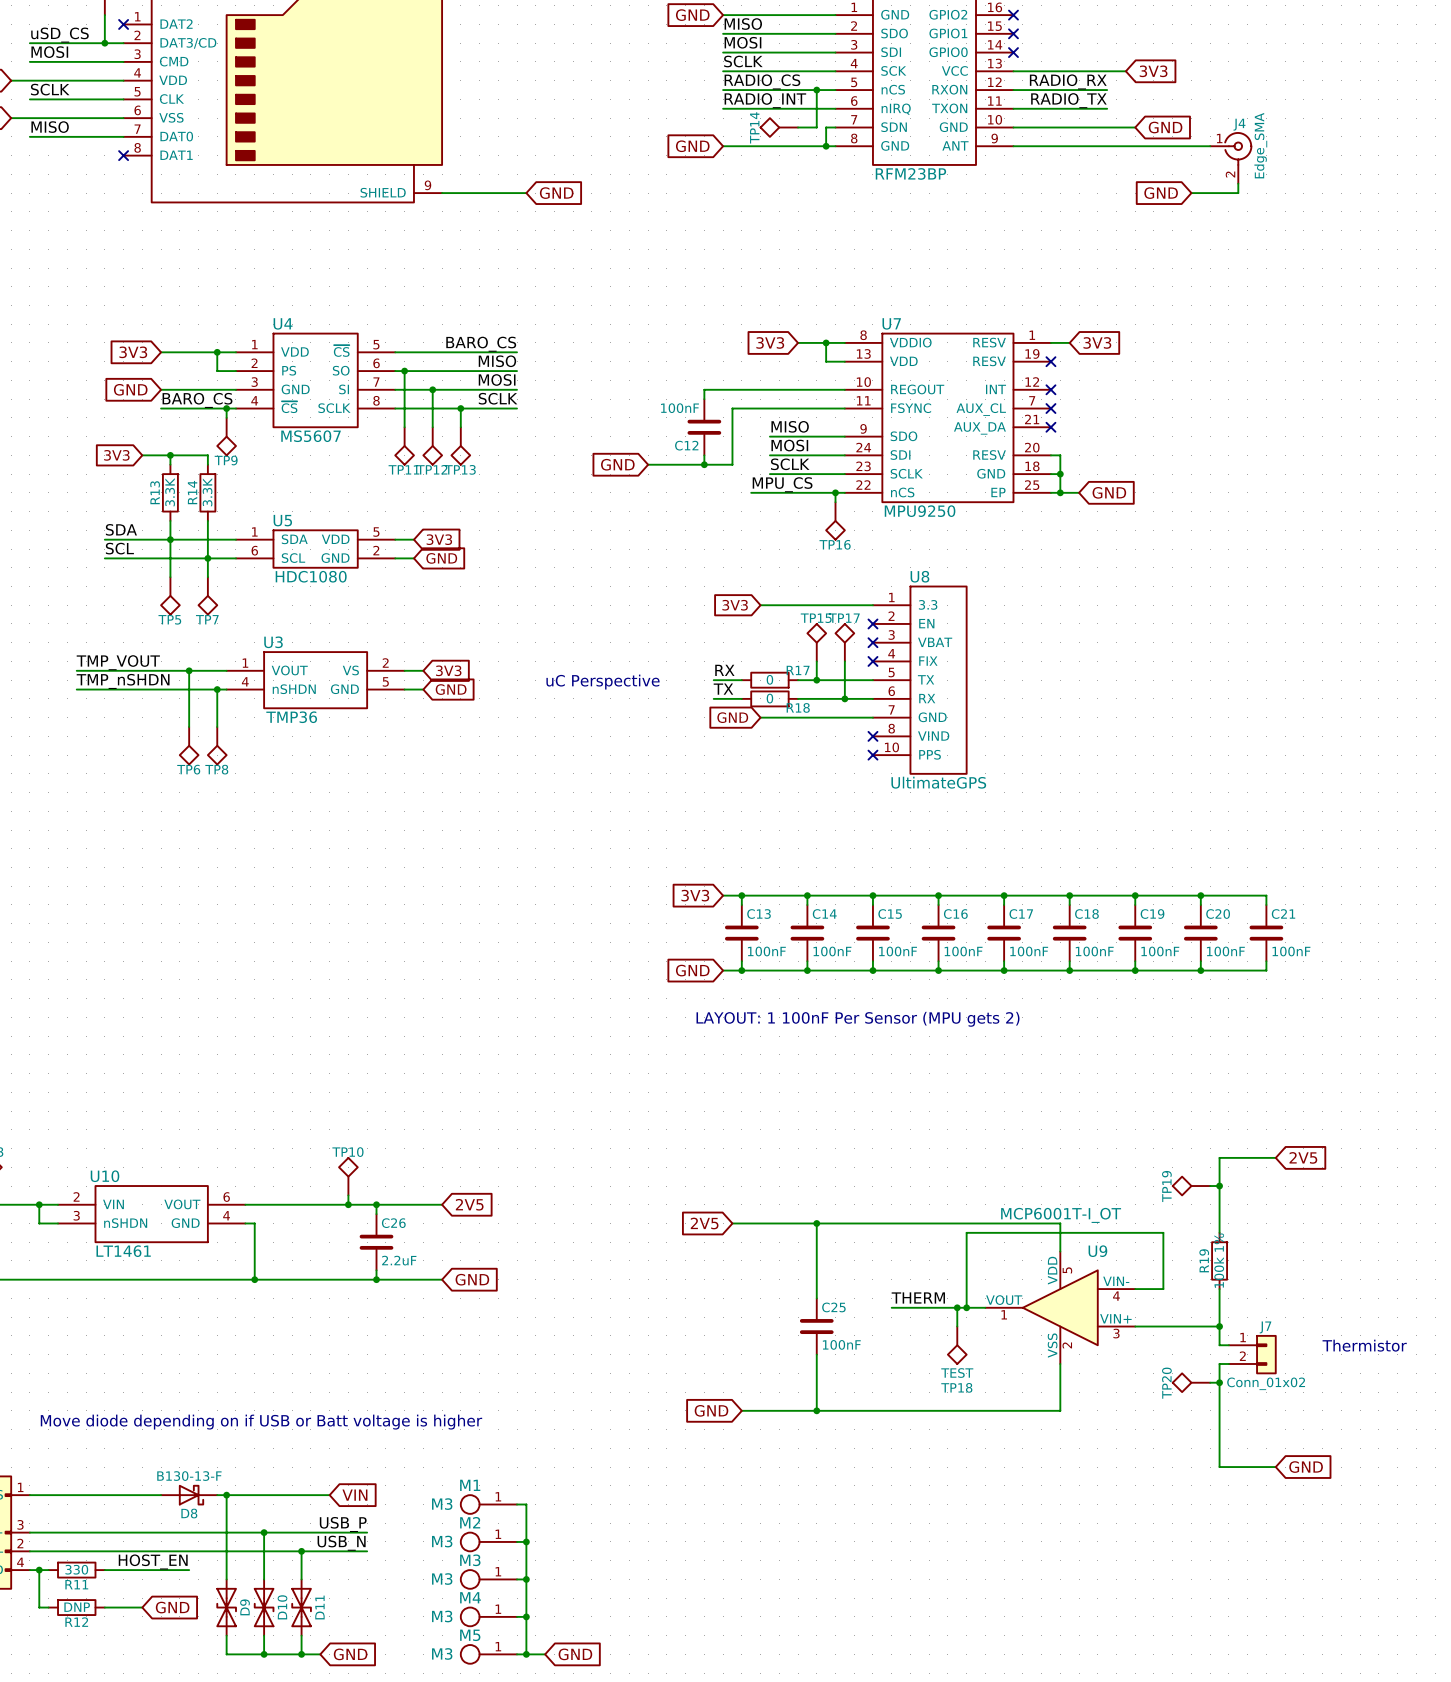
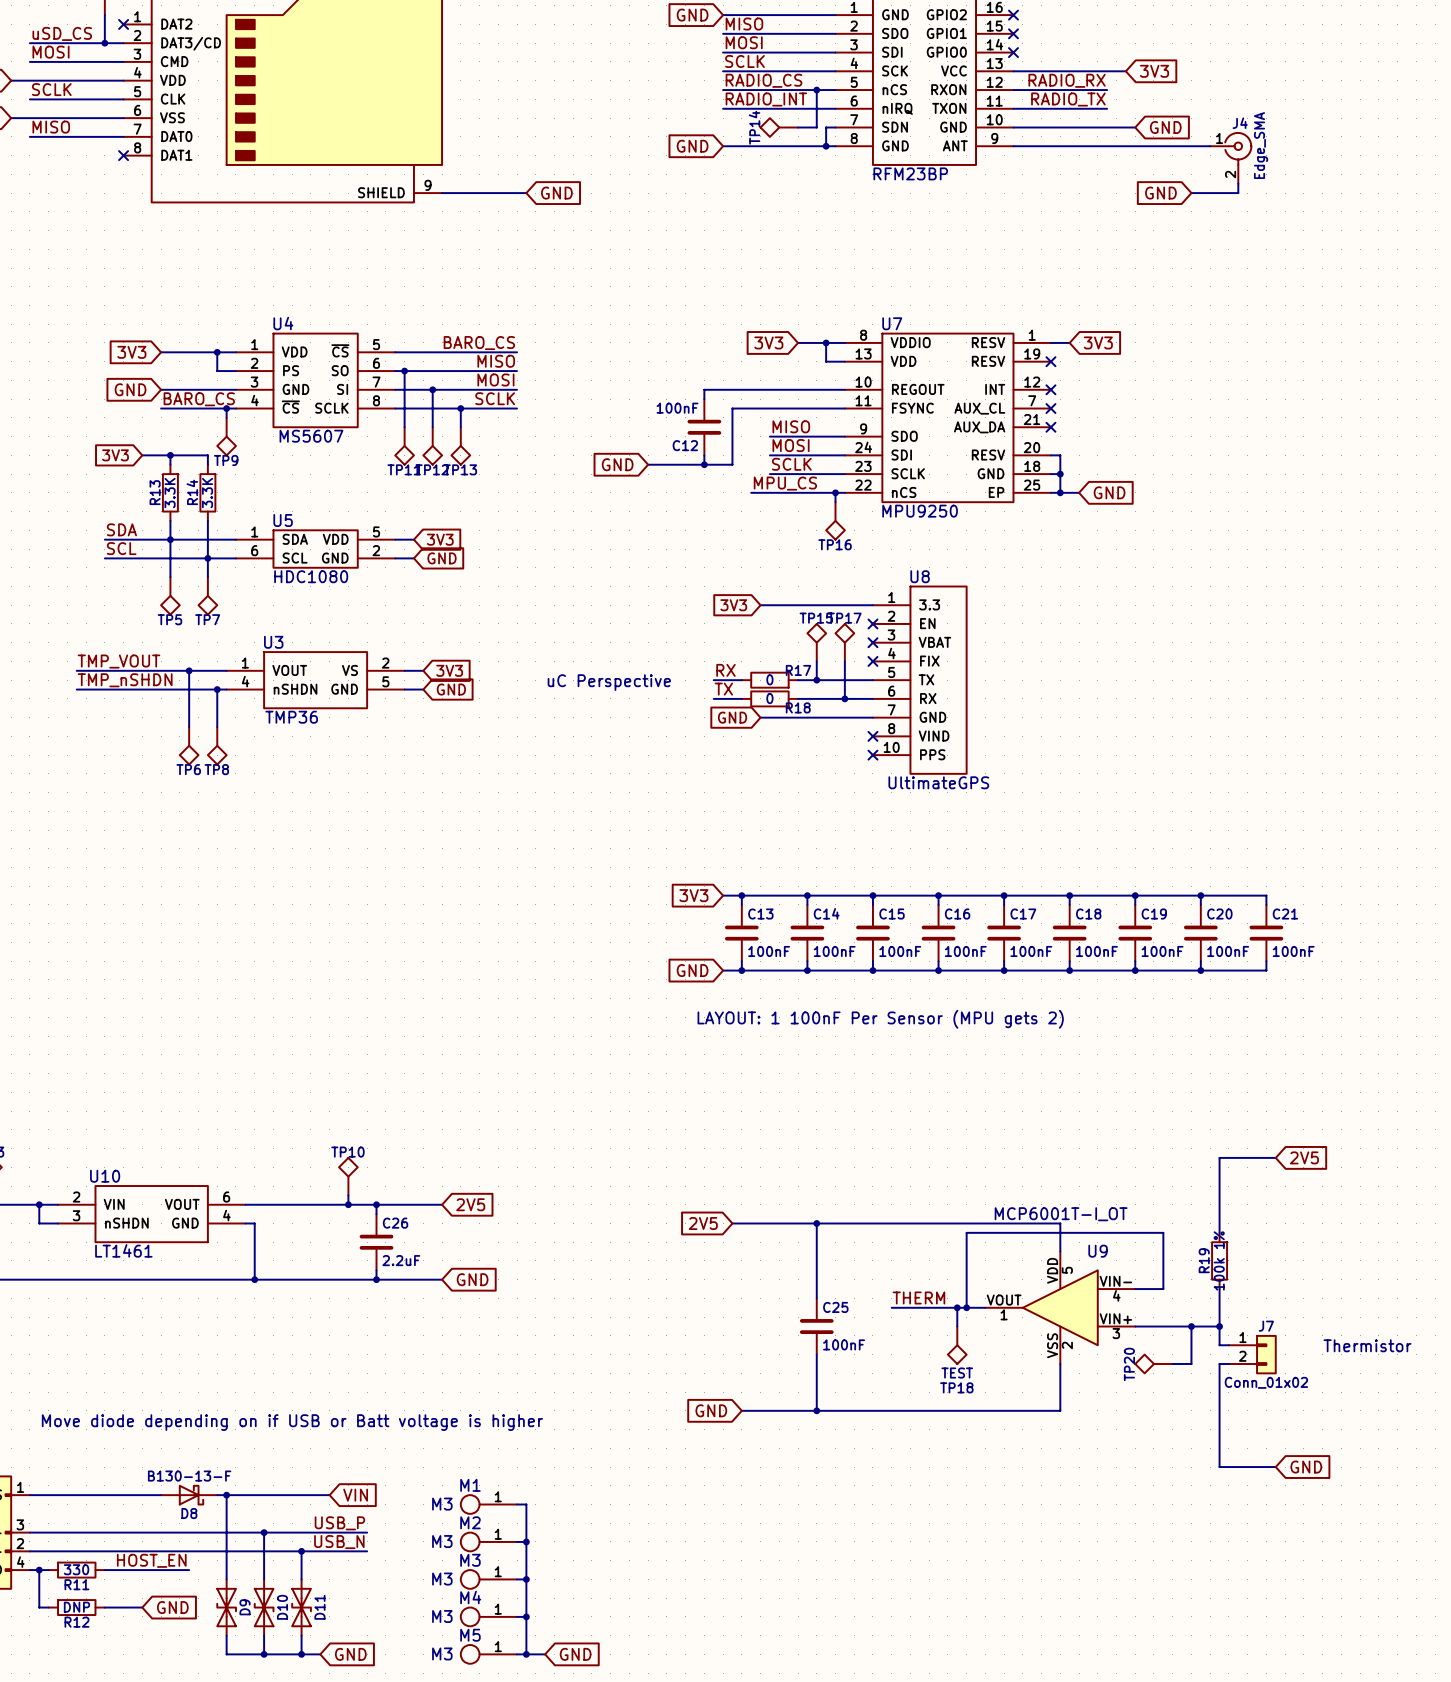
TP19: (1191, 1186) -> none
wire: (1210, 1186) (1219, 1186) -> none
junction: (1219, 1186) -> none
wire: none -> (1191, 1326) (1191, 1363) (1172, 1363)
junction: none -> (1191, 1326)
TP20 position: (1191, 1382) -> (1153, 1363)
wire: (1210, 1382) (1219, 1382) -> none
junction: (1219, 1382) -> none

